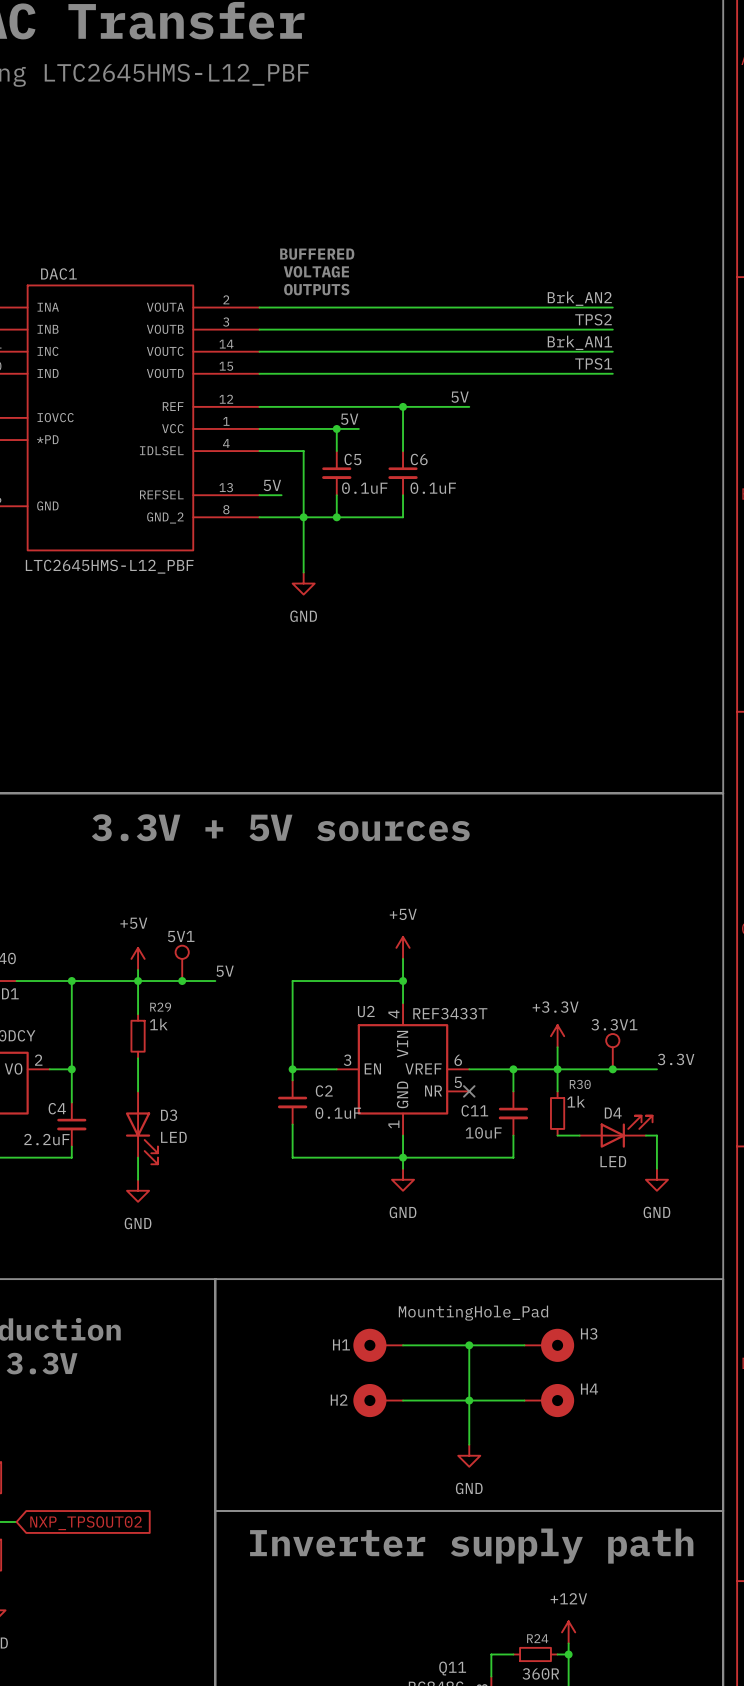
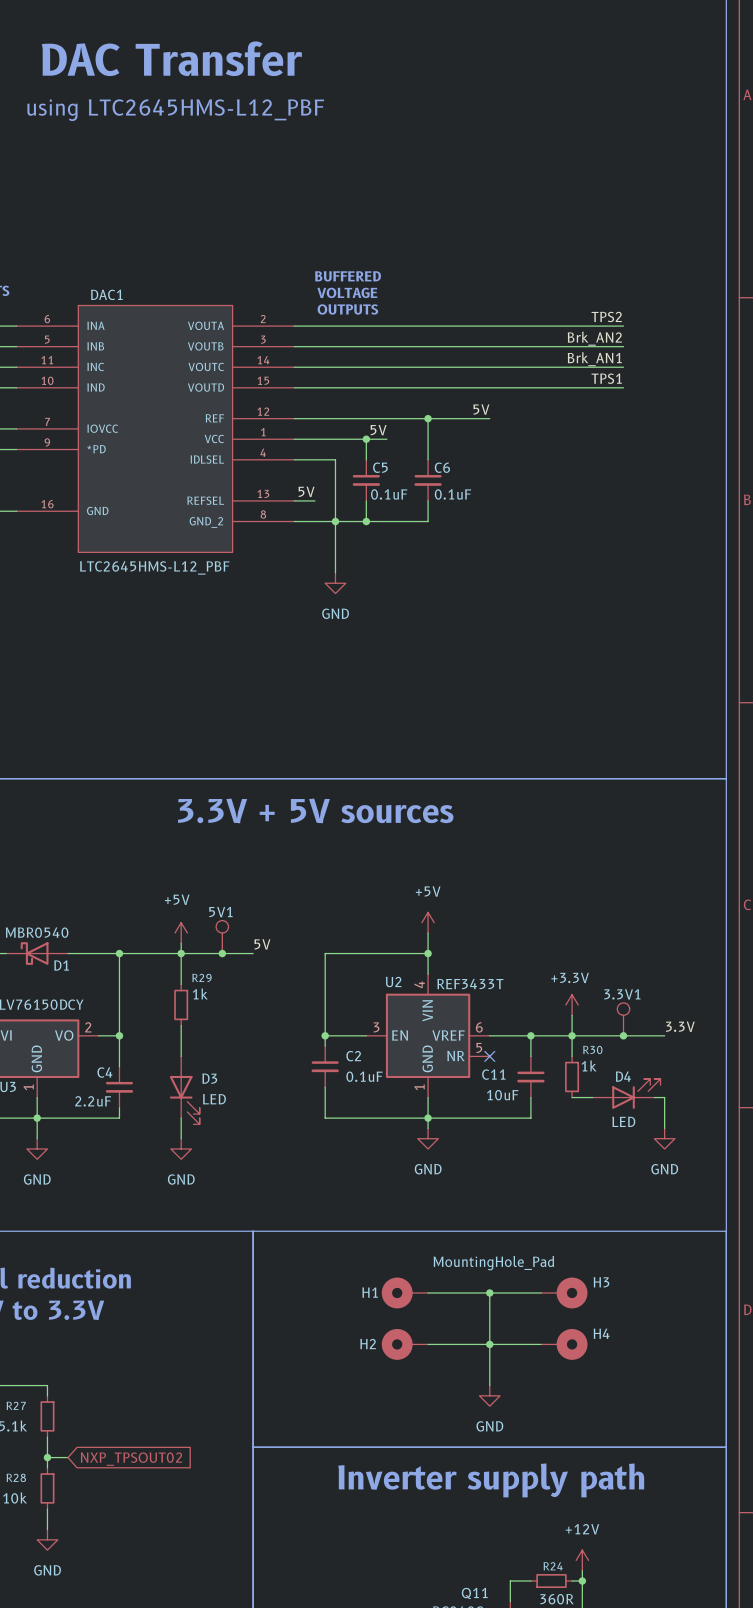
label: Brk_AN2 (579, 298) -> TPS2 (606, 316)
label: TPS2 (593, 319) -> Brk_AN2 (594, 338)

